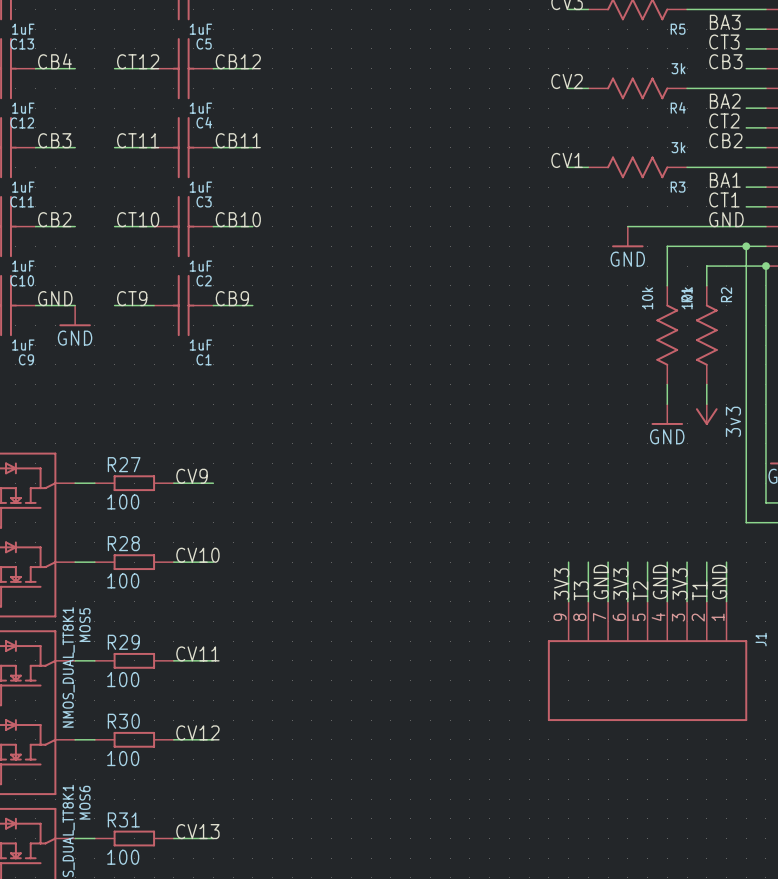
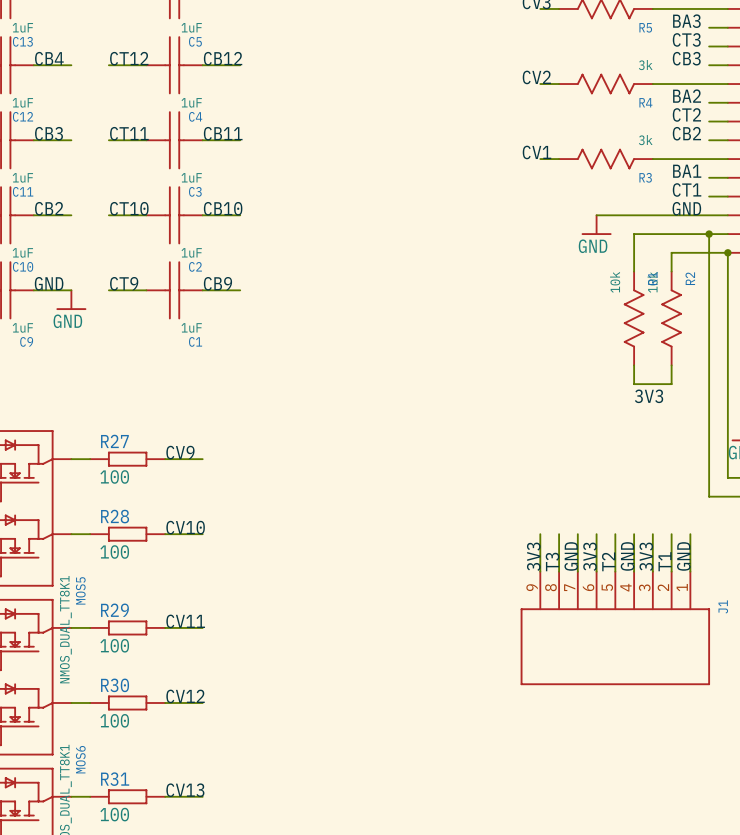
wire: none -> (634, 384) (671, 384)
power symbol: GND (667, 414) -> none
power symbol: 3v3 (706, 414) -> none
label: none -> 3V3 (649, 396)

